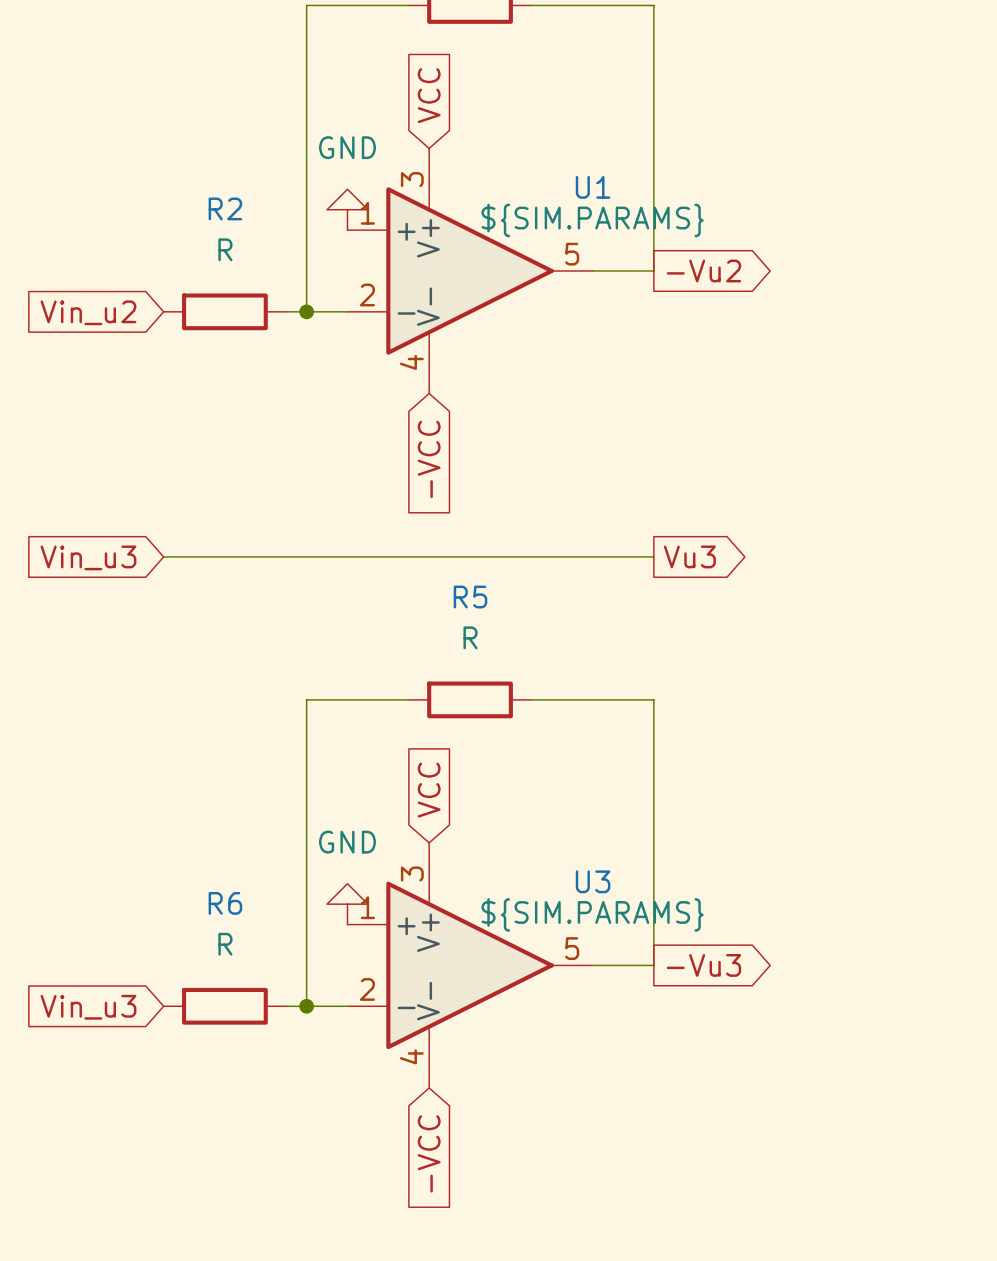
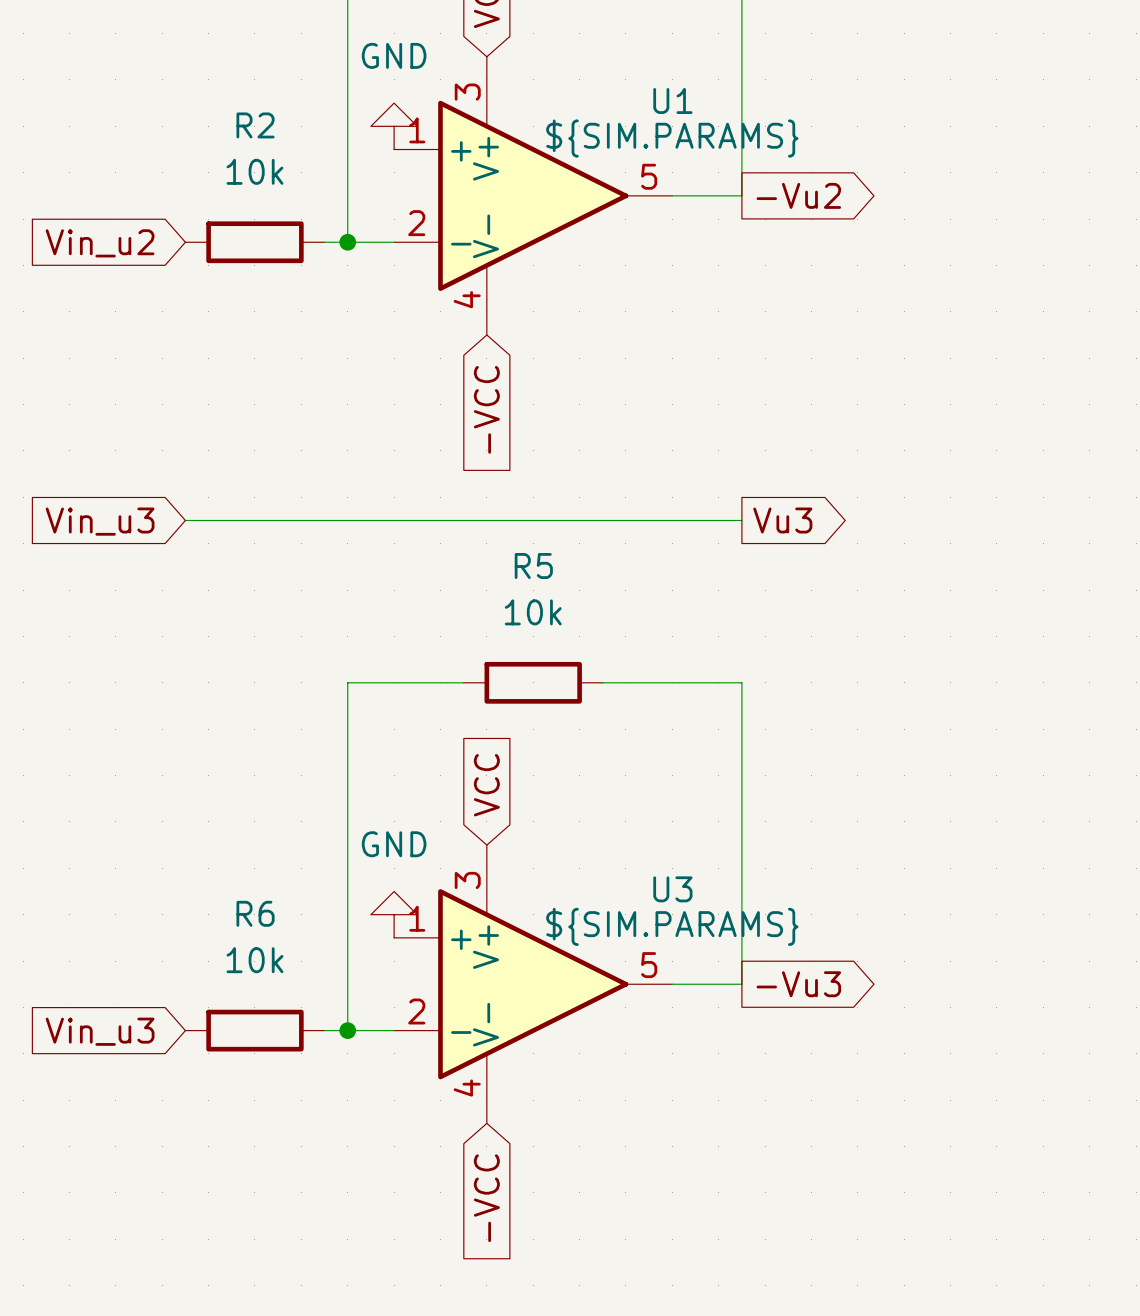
R2 value: R (225, 249) -> 10k (254, 171)
R5 value: R (470, 637) -> 10k (533, 612)
R6 value: R (225, 944) -> 10k (254, 960)

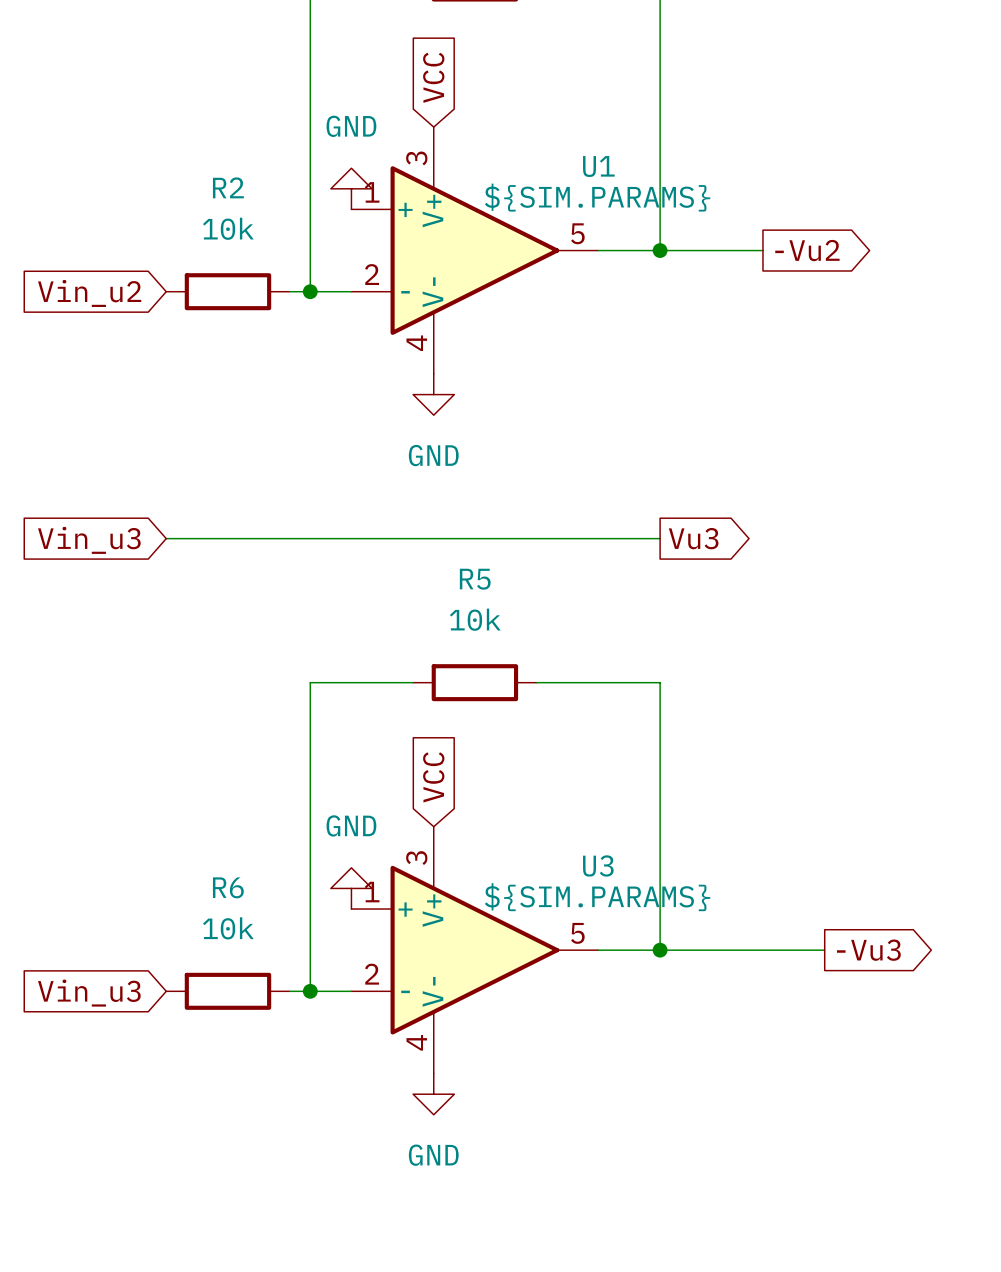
wire: none -> (660, 250) (762, 250)
junction: none -> (660, 250)
global label position: -Vu2 (798, 195) -> -Vu2 (807, 250)
power symbol: none -> GND (433, 394)
global label: -VCC (486, 409) -> none
wire: none -> (660, 950) (824, 950)
junction: none -> (660, 950)
global label position: -Vu3 (798, 984) -> -Vu3 (868, 950)
power symbol: none -> GND (433, 1094)
global label: -VCC (486, 1198) -> none

